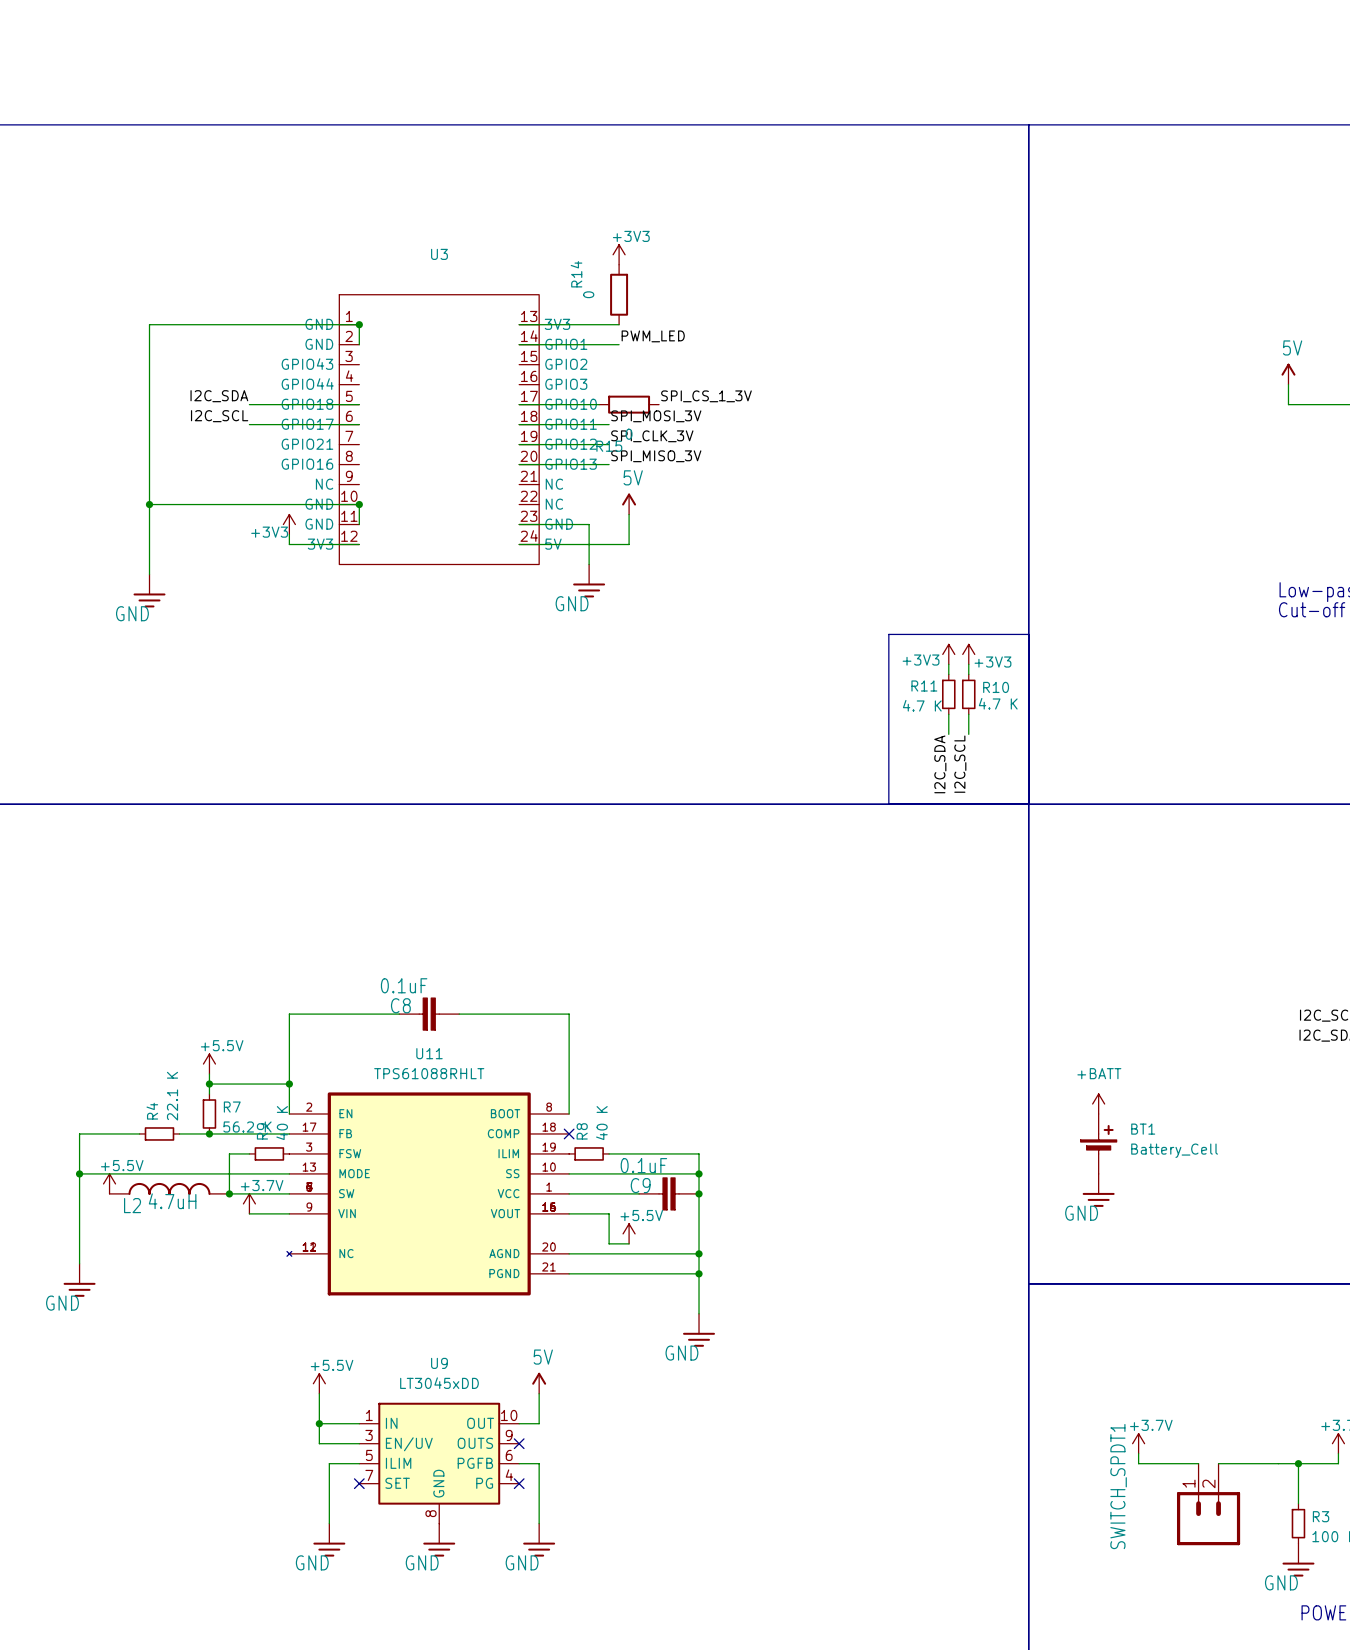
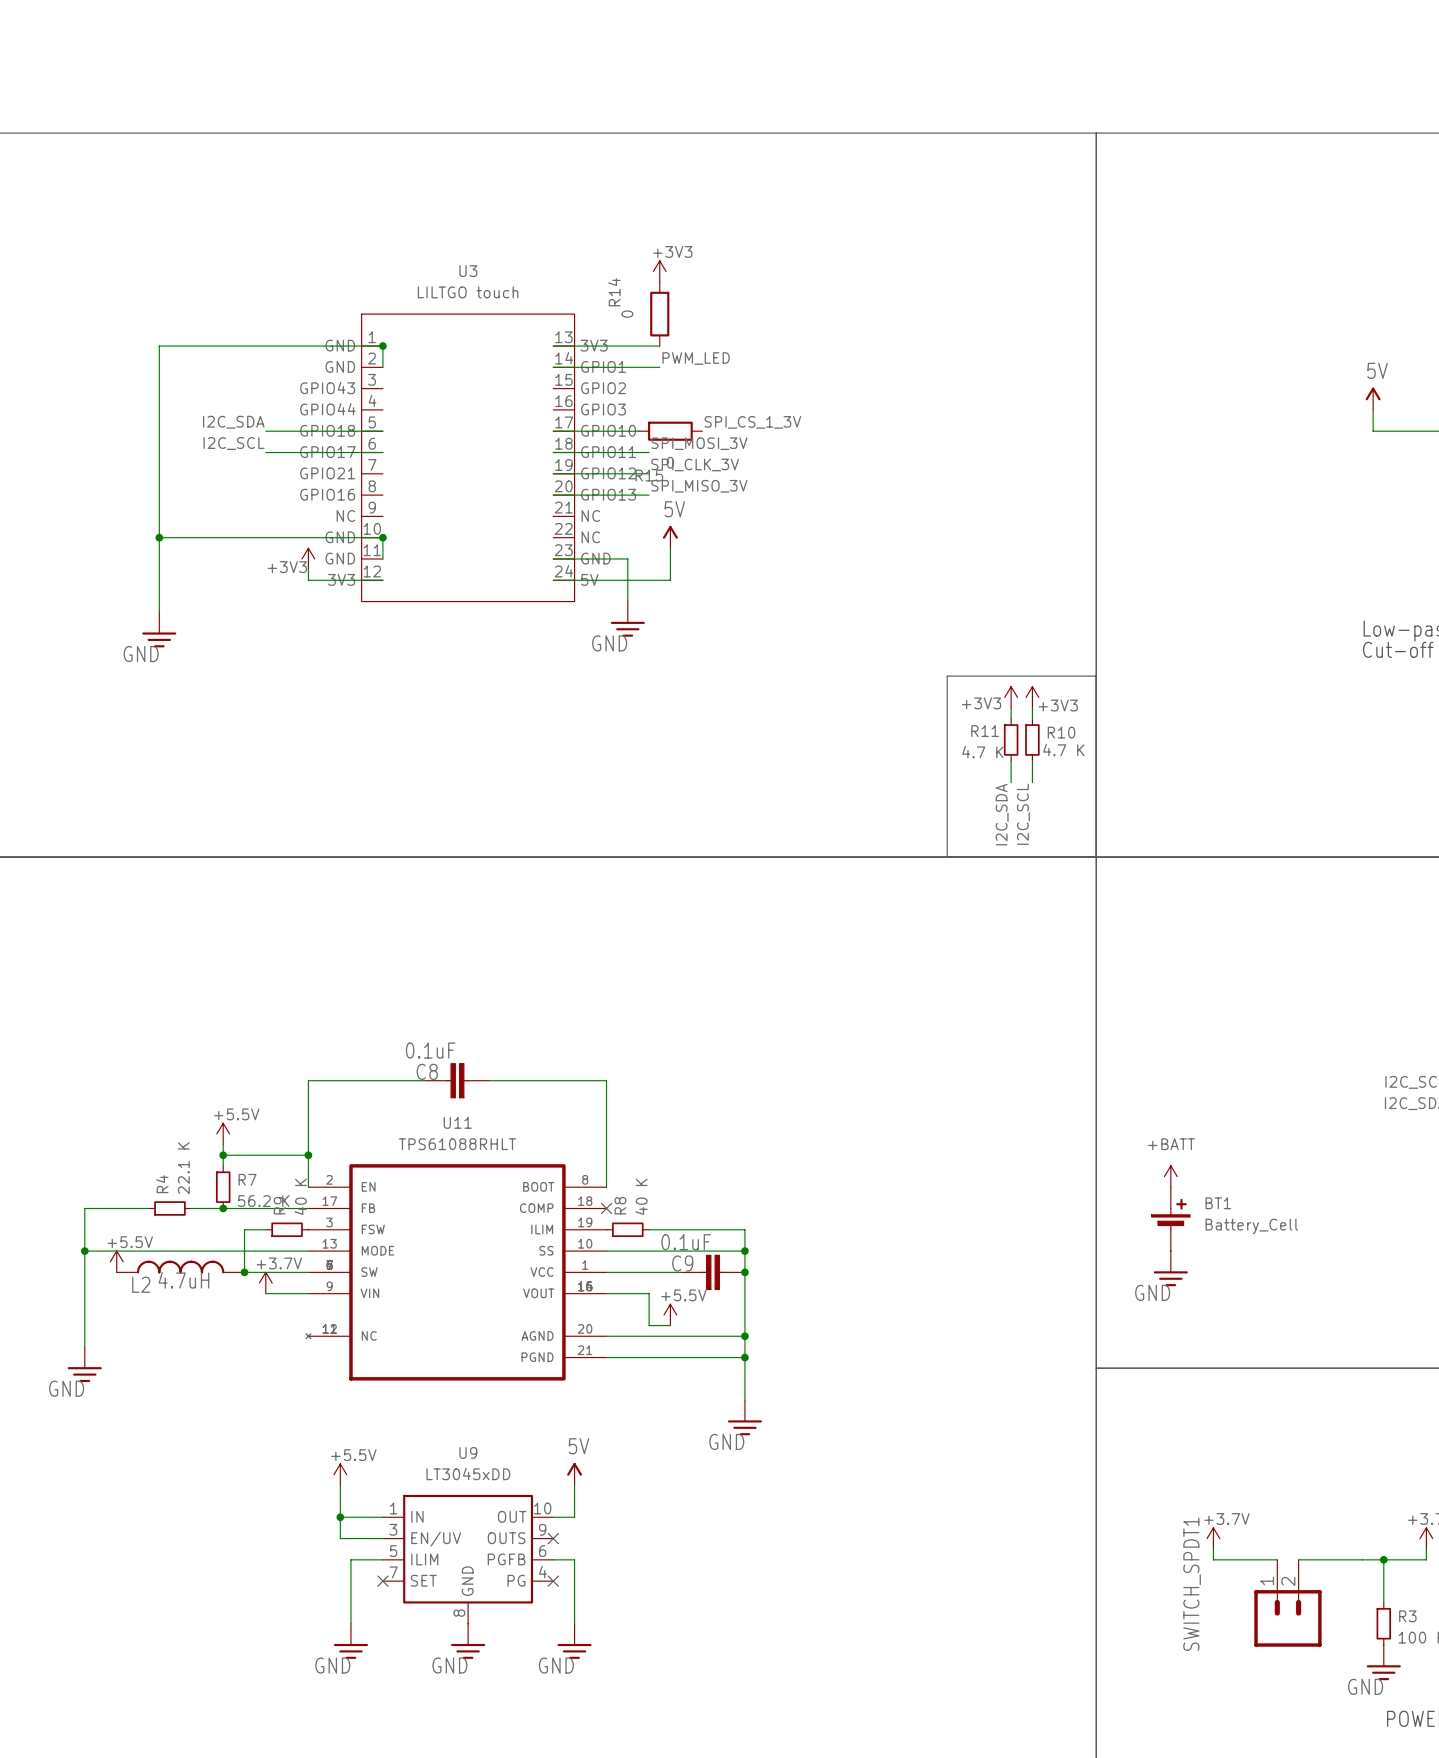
U3 value: none -> LILTGO touch (468, 292)

